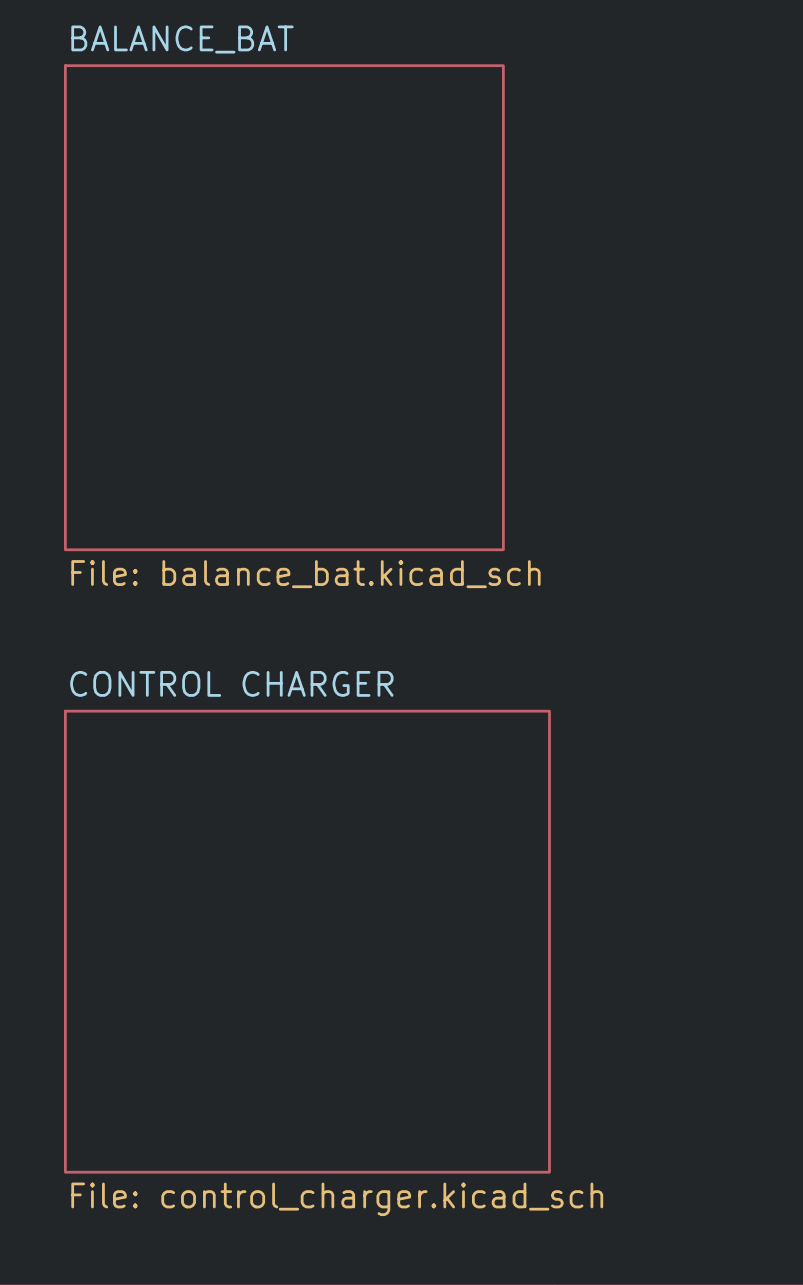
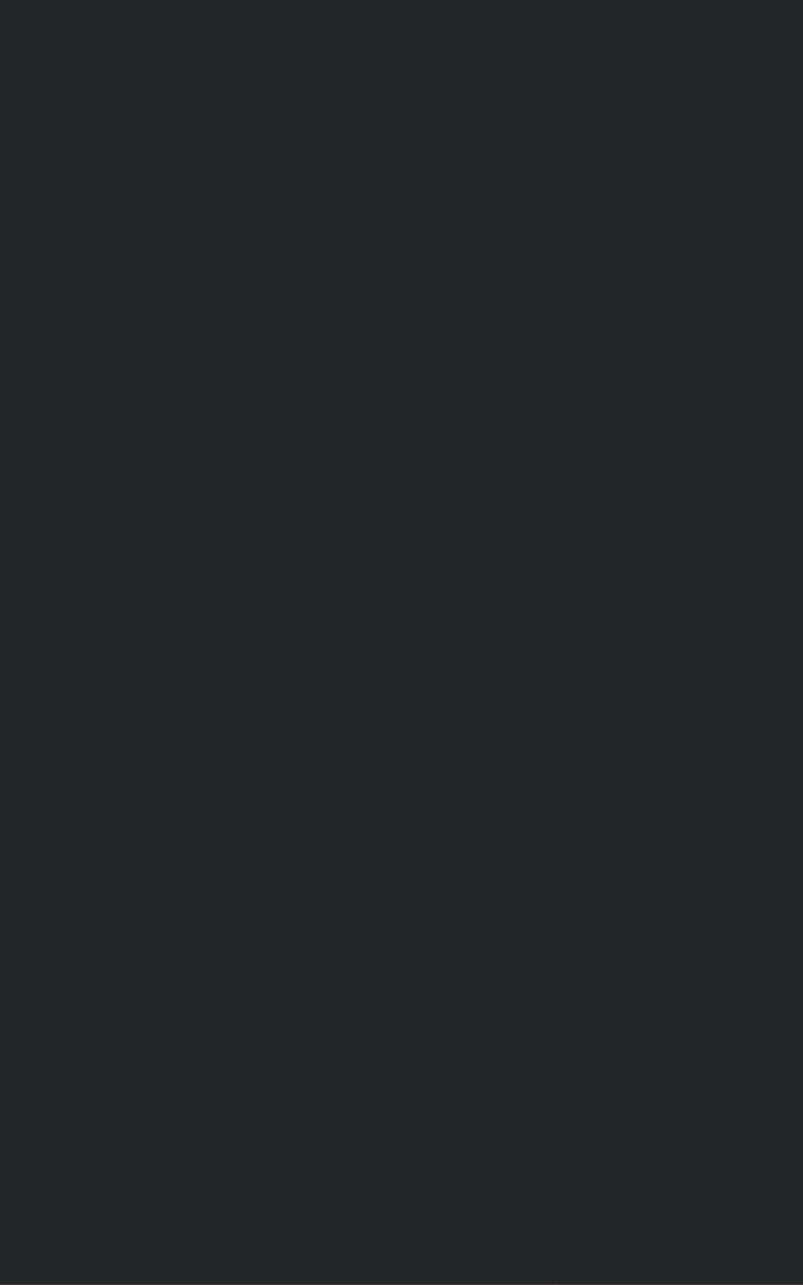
sheet BALANCE_BAT: File: balance_bat.kicad_sch (284, 307) -> none
sheet CONTROL CHARGER: File: control_charger.kicad_sch (307, 941) -> none

